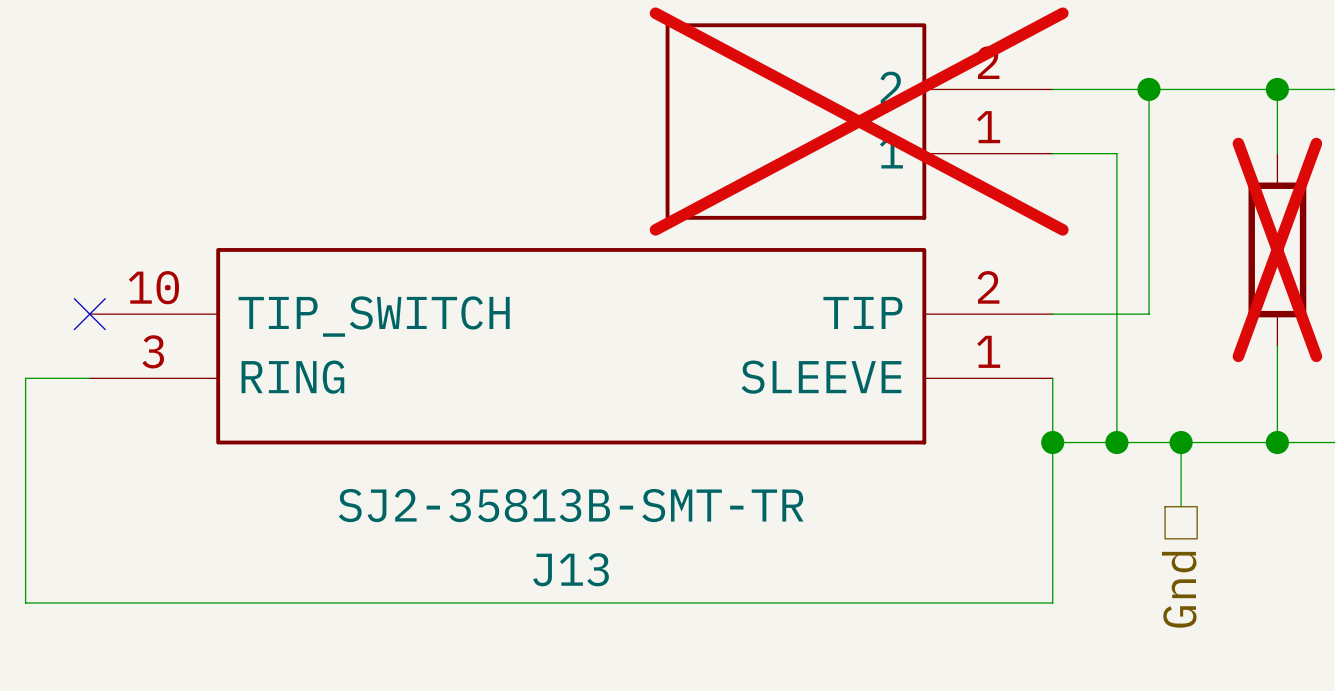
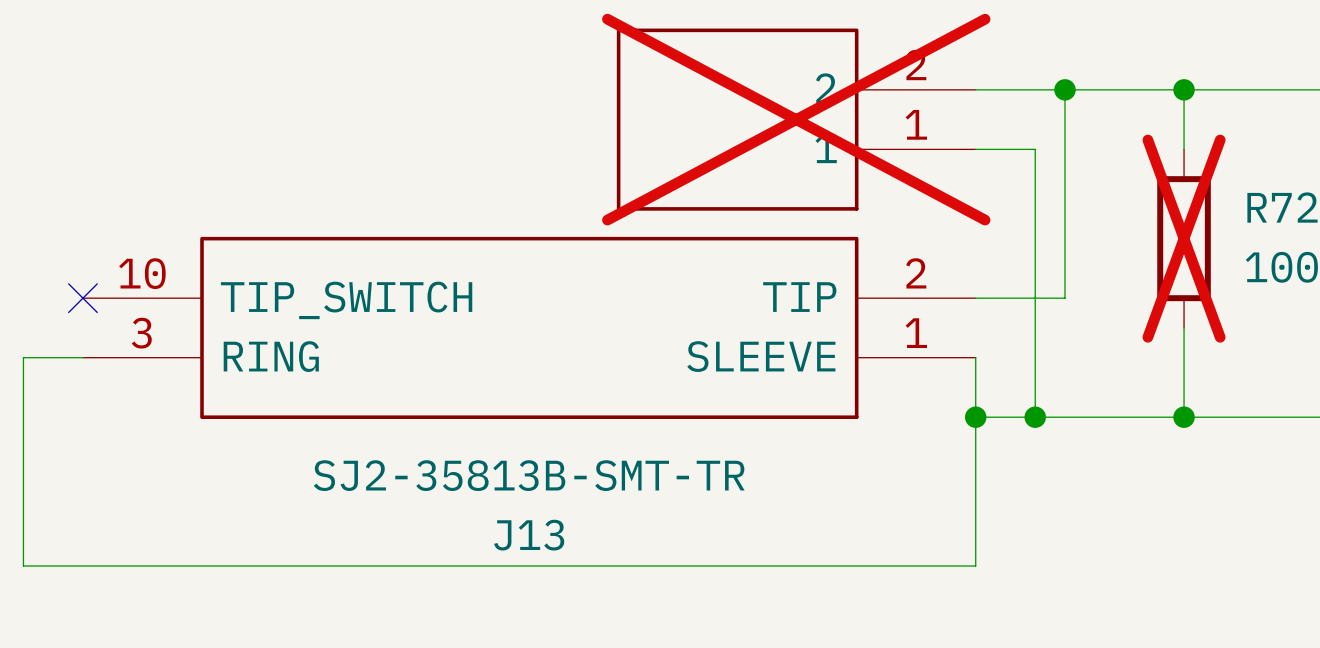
wire: (1181, 442) (1181, 506) -> none
junction: (1181, 442) -> none
hierarchical label: Gnd (1179, 589) -> none

